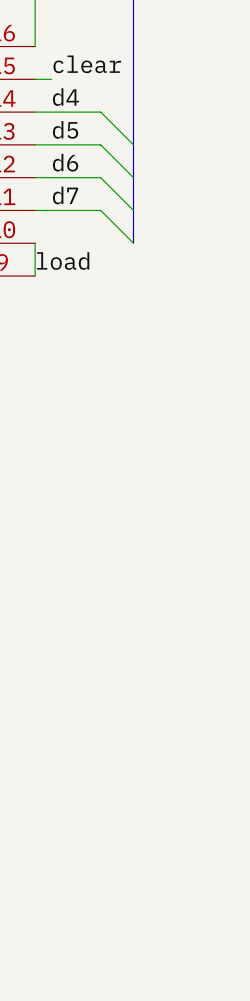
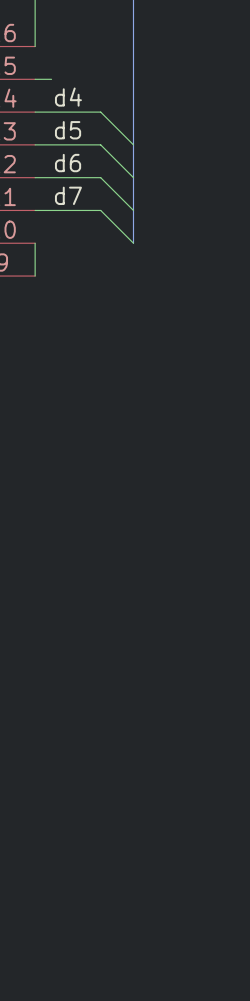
label: clear (87, 64) -> none
label: load (63, 261) -> none

